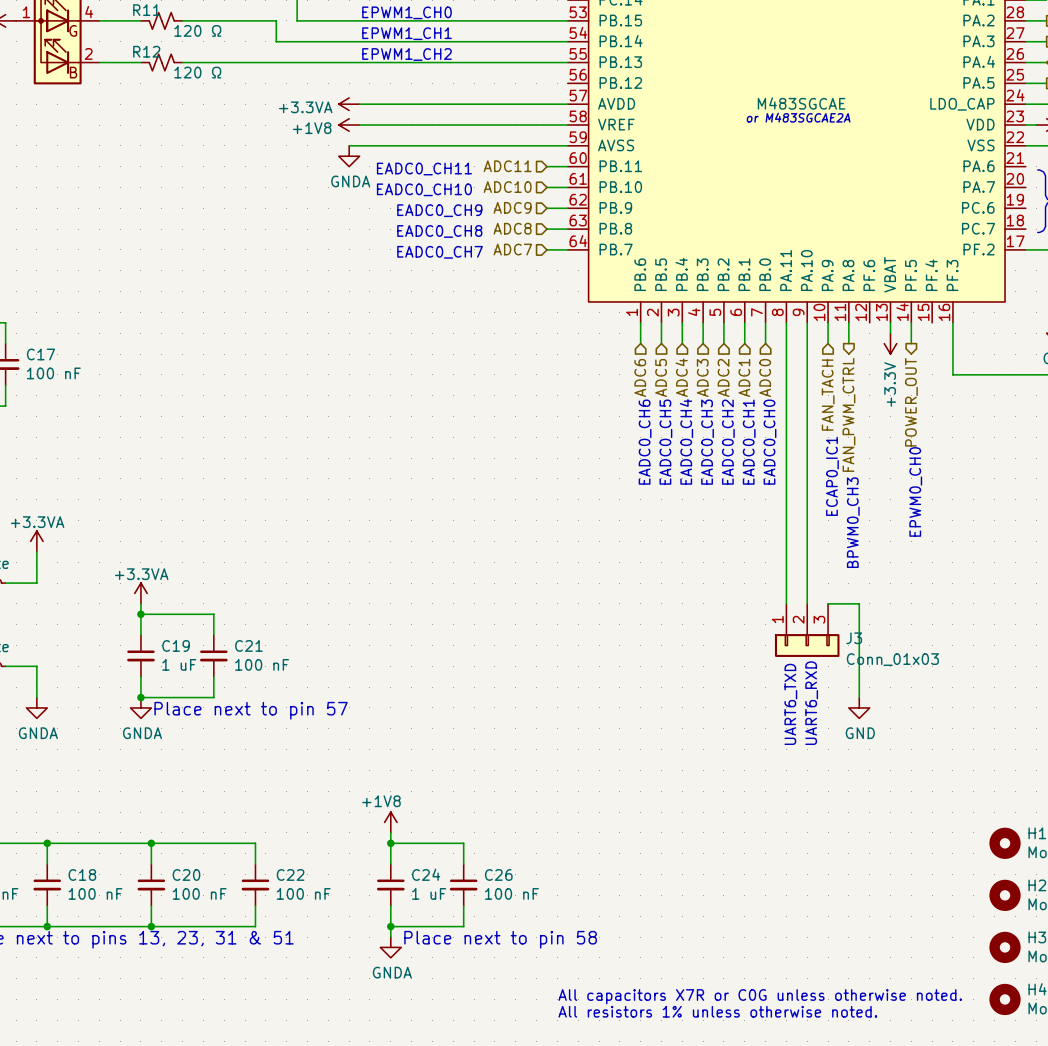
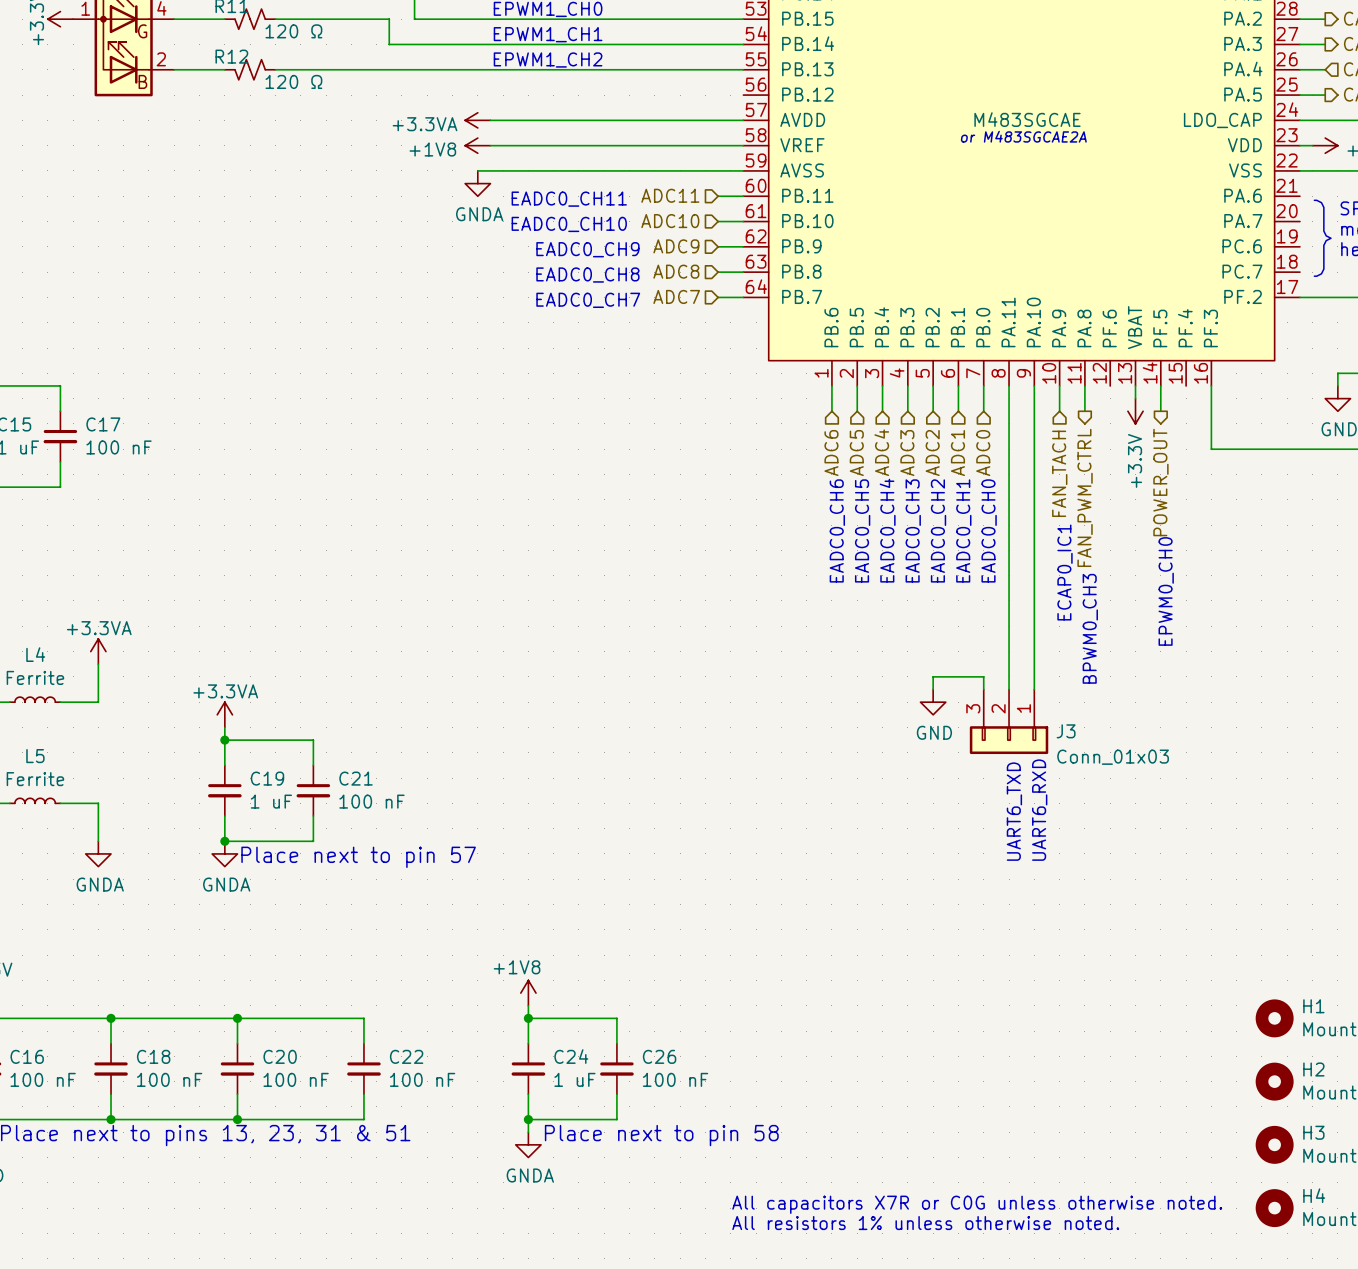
wire: none -> (933, 689) (933, 676) (983, 676) (983, 689)
wire: (828, 603) (859, 603) (859, 697) -> none
J3 flip: as is (807, 645) -> left-right (1009, 740)
text position: UART6_RXD (811, 703) -> UART6_RXD (1039, 810)
text position: UART6_TXD (790, 704) -> UART6_TXD (1014, 811)
power symbol position: GND (859, 707) -> GND (933, 702)

